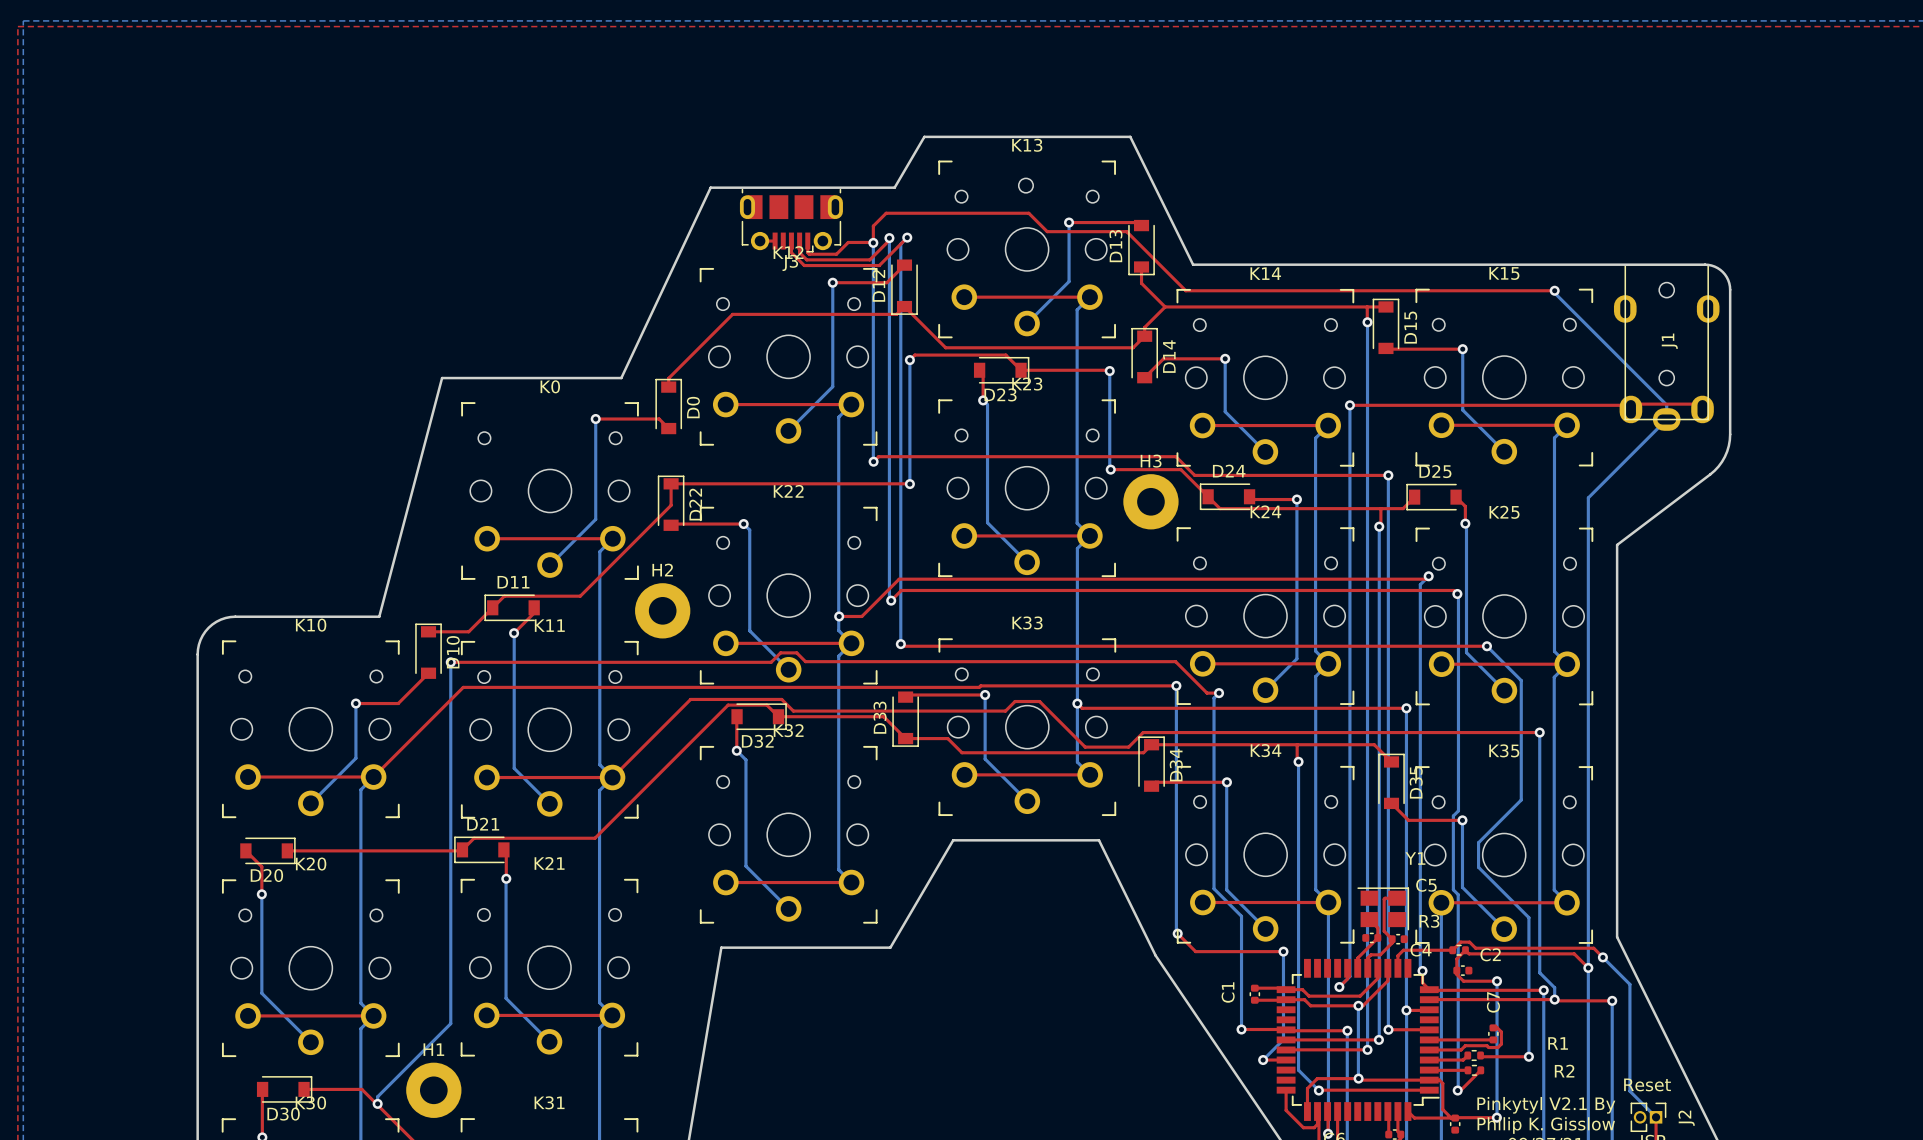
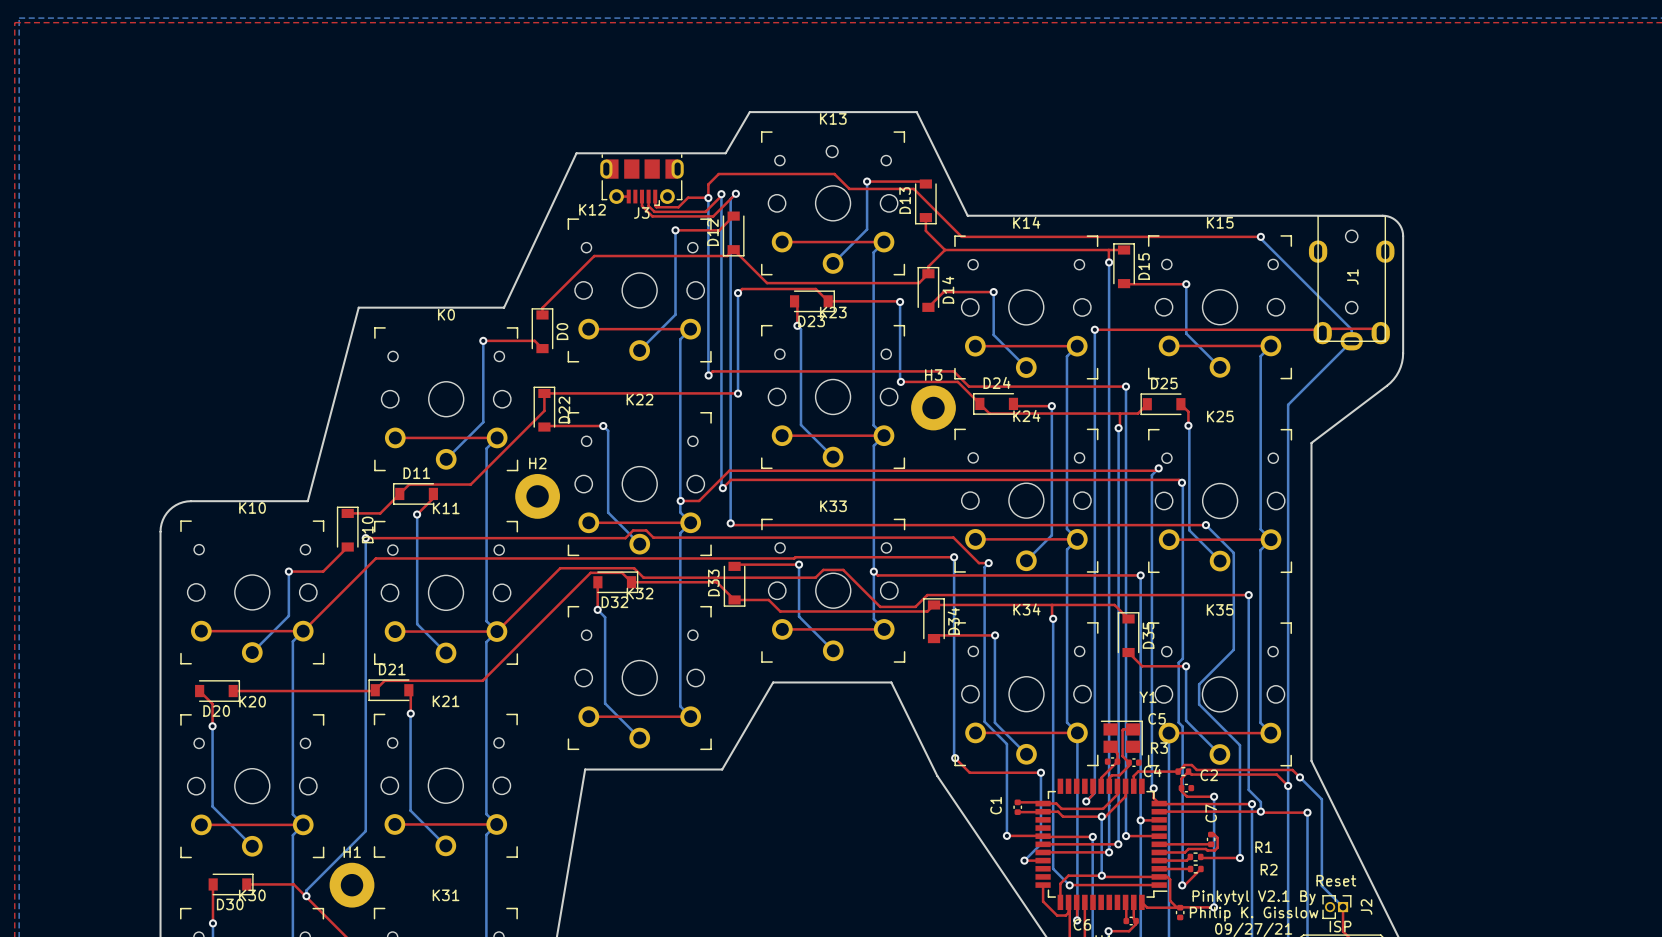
K12 name position: K12 (788, 252) -> K12 (592, 209)

